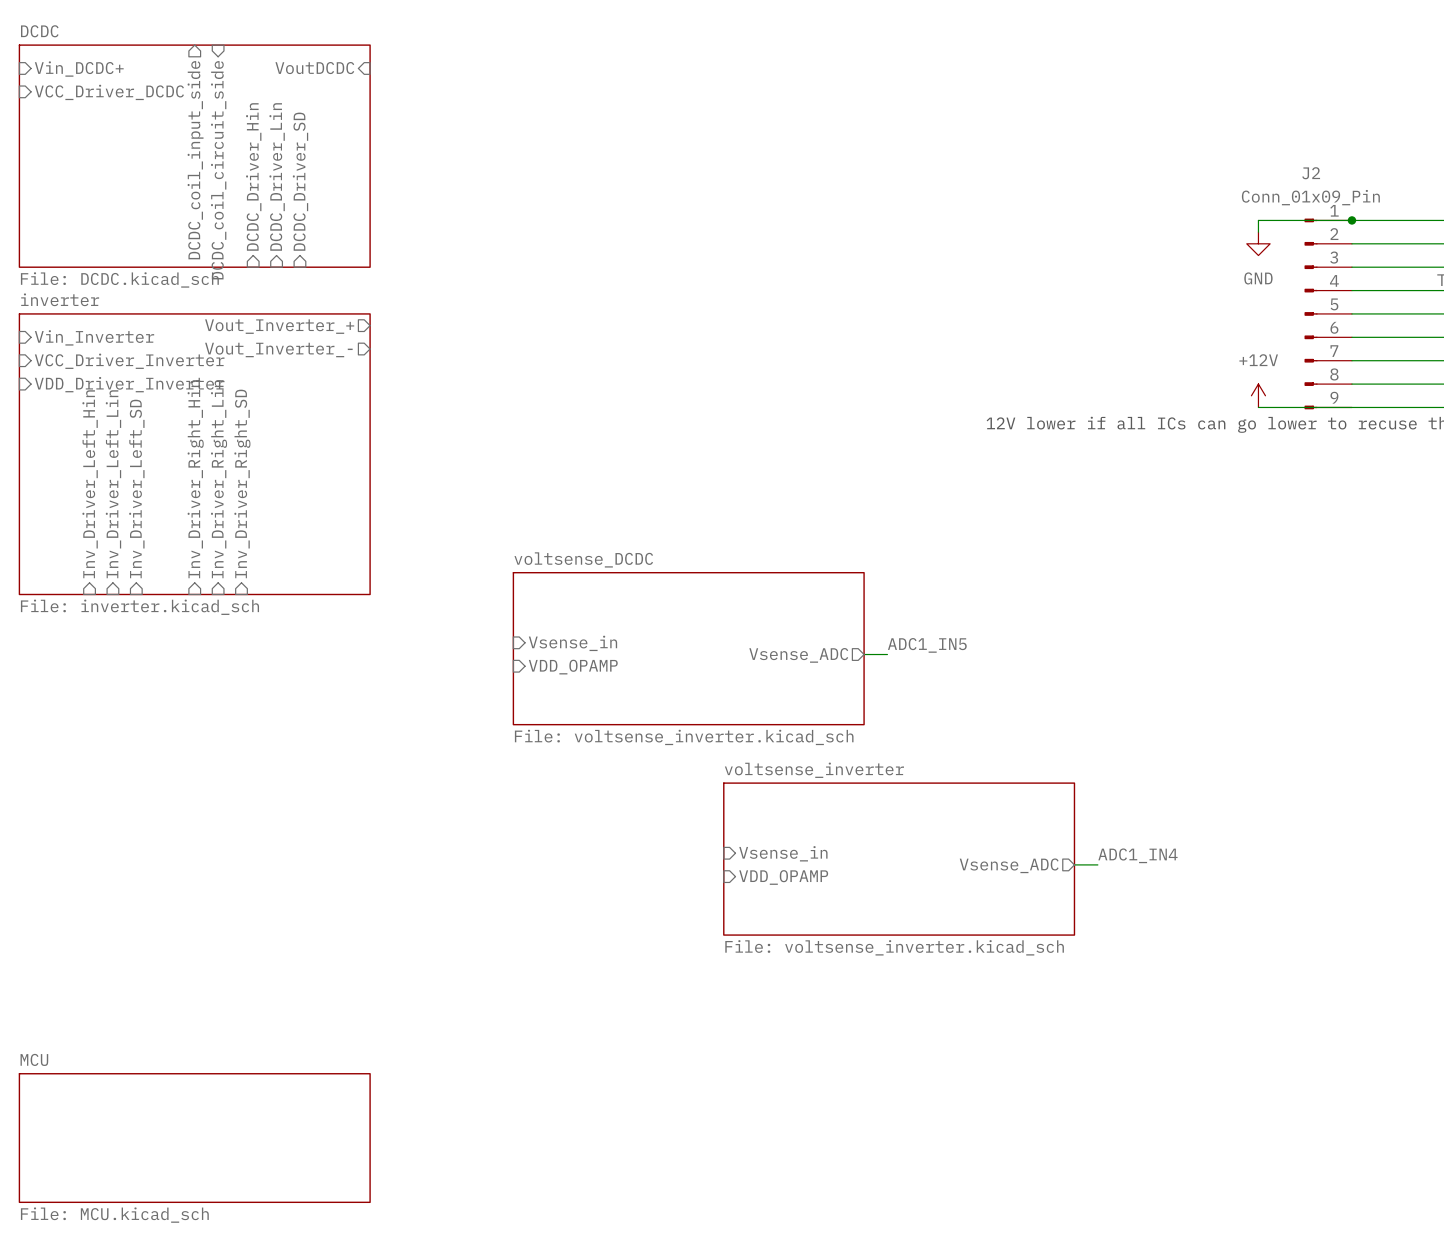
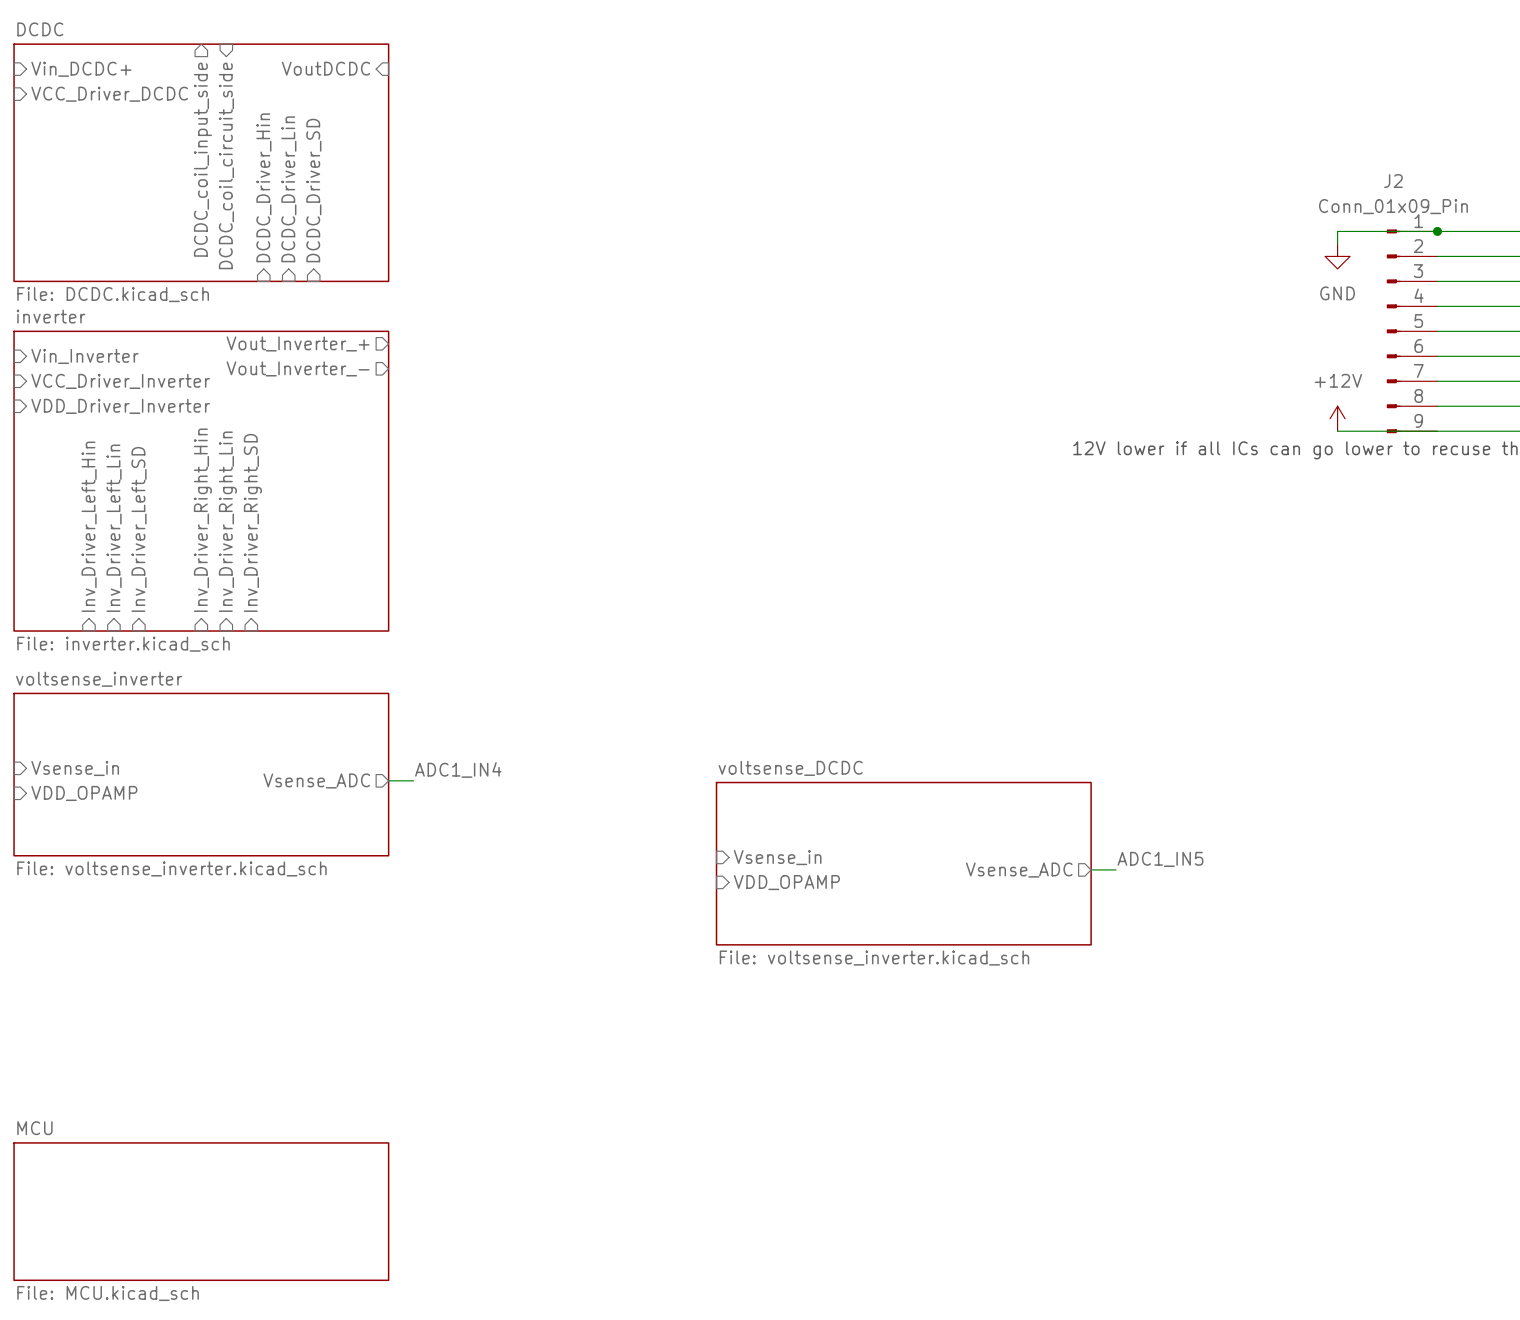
sheet pin: Vsense_in (572, 643) -> none
label: ADC1_IN5 (927, 645) -> none
sheet voltsense_DCDC: File: voltsense_inverter.kicad_sch (688, 648) -> none
wire: (864, 654) (887, 654) -> none
sheet pin: Vsense_ADC (798, 655) -> none
sheet pin: VDD_OPAMP (573, 667) -> none
sheet pin: none -> Vsense_in (75, 768)
label: none -> ADC1_IN4 (458, 769)
sheet voltsense_inverter: none -> File: voltsense_inverter.kicad_sch (201, 774)
wire: none -> (388, 780) (413, 780)
sheet pin: none -> Vsense_ADC (316, 780)
sheet pin: none -> VDD_OPAMP (84, 793)
label: none -> ADC1_IN5 (1160, 859)
sheet voltsense_DCDC: none -> File: voltsense_inverter.kicad_sch (903, 863)
sheet pin position: Vsense_in (783, 853) -> Vsense_in (777, 857)
label: ADC1_IN4 (1137, 855) -> none
sheet voltsense_inverter: File: voltsense_inverter.kicad_sch (899, 859) -> none
wire: (1074, 864) (1097, 864) -> (1091, 869) (1116, 869)
sheet pin position: Vsense_ADC (1009, 865) -> Vsense_ADC (1019, 870)
sheet pin position: VDD_OPAMP (783, 877) -> VDD_OPAMP (786, 882)

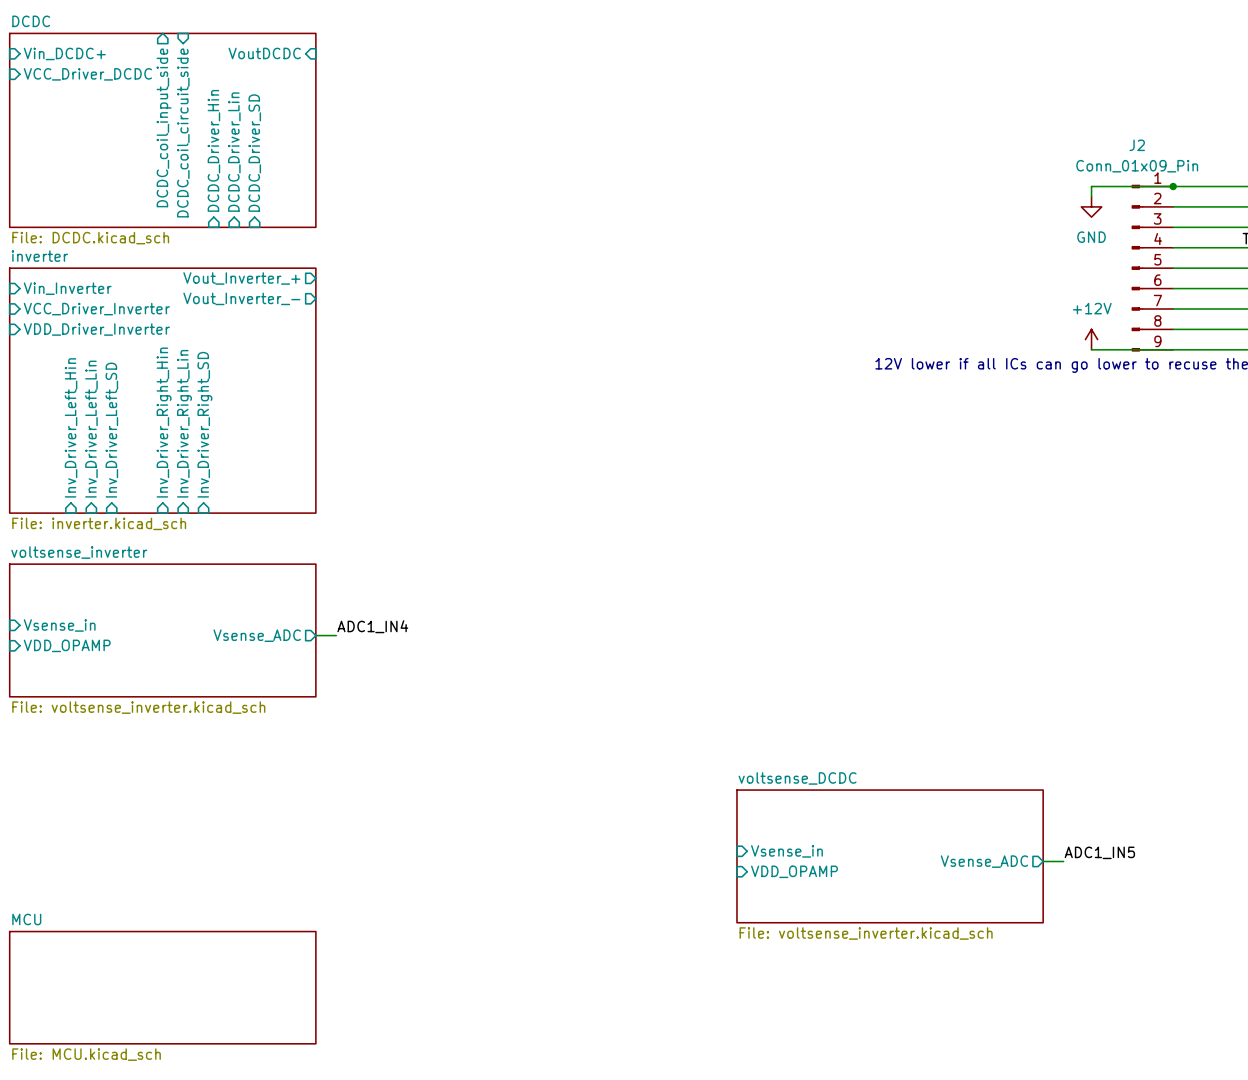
sheet pin: Vsense_in (777, 857) -> none
label: ADC1_IN5 (1160, 859) -> none
sheet voltsense_DCDC: File: voltsense_inverter.kicad_sch (903, 863) -> none
wire: (1091, 869) (1116, 869) -> none
sheet pin: Vsense_ADC (1019, 870) -> none
sheet pin: VDD_OPAMP (786, 882) -> none
sheet pin: none -> Vsense_in (786, 851)
label: none -> ADC1_IN5 (1099, 852)
sheet voltsense_DCDC: none -> File: voltsense_inverter.kicad_sch (890, 856)
sheet pin: none -> Vsense_ADC (984, 861)
wire: none -> (1043, 861) (1063, 861)
sheet pin: none -> VDD_OPAMP (794, 871)

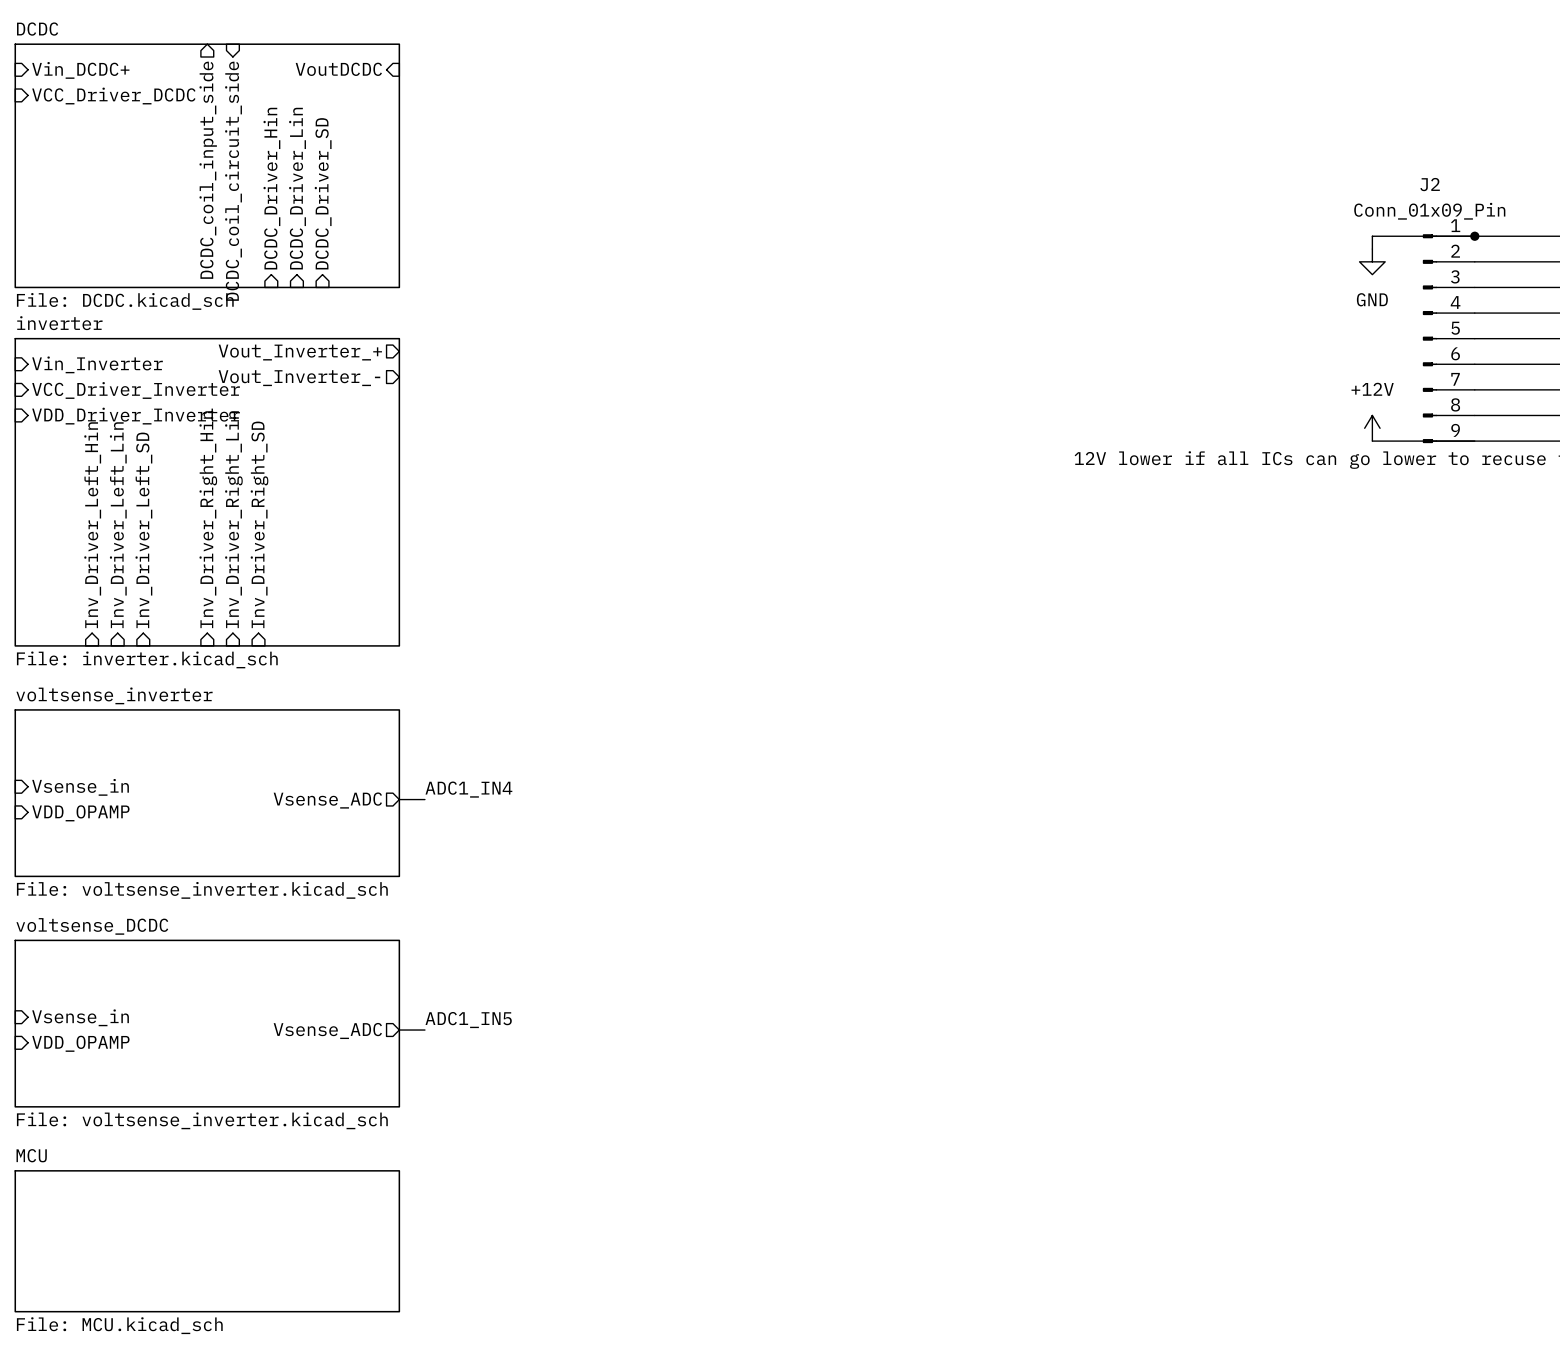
sheet pin: none -> Vsense_in (80, 1017)
label: none -> ADC1_IN5 (468, 1020)
sheet voltsense_DCDC: none -> File: voltsense_inverter.kicad_sch (207, 1023)
sheet pin: none -> Vsense_ADC (327, 1030)
wire: none -> (399, 1030) (424, 1030)
sheet pin: none -> VDD_OPAMP (80, 1043)
sheet pin: Vsense_in (786, 851) -> none
label: ADC1_IN5 (1099, 852) -> none
sheet voltsense_DCDC: File: voltsense_inverter.kicad_sch (890, 856) -> none
sheet pin: Vsense_ADC (984, 861) -> none
wire: (1043, 861) (1063, 861) -> none
sheet pin: VDD_OPAMP (794, 871) -> none

